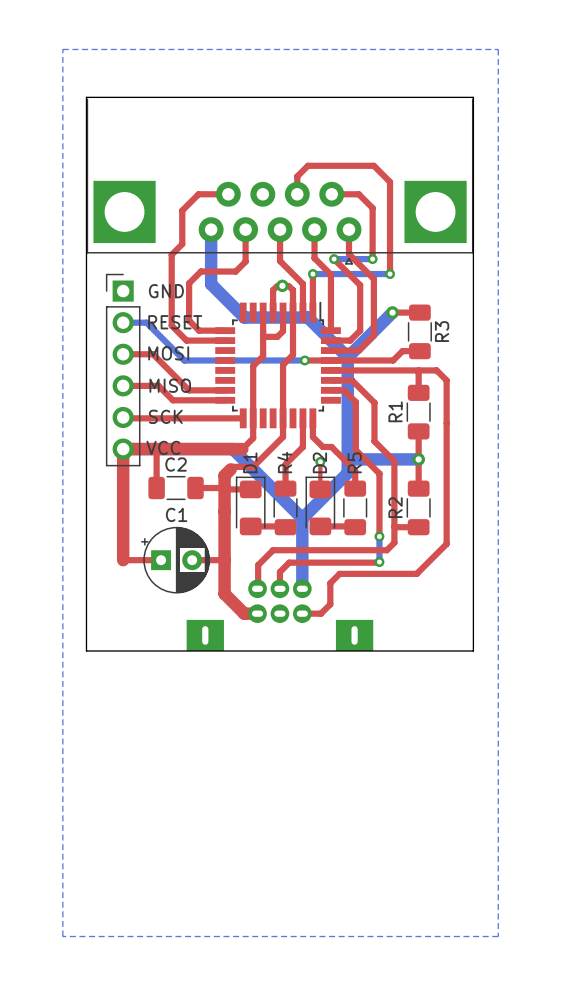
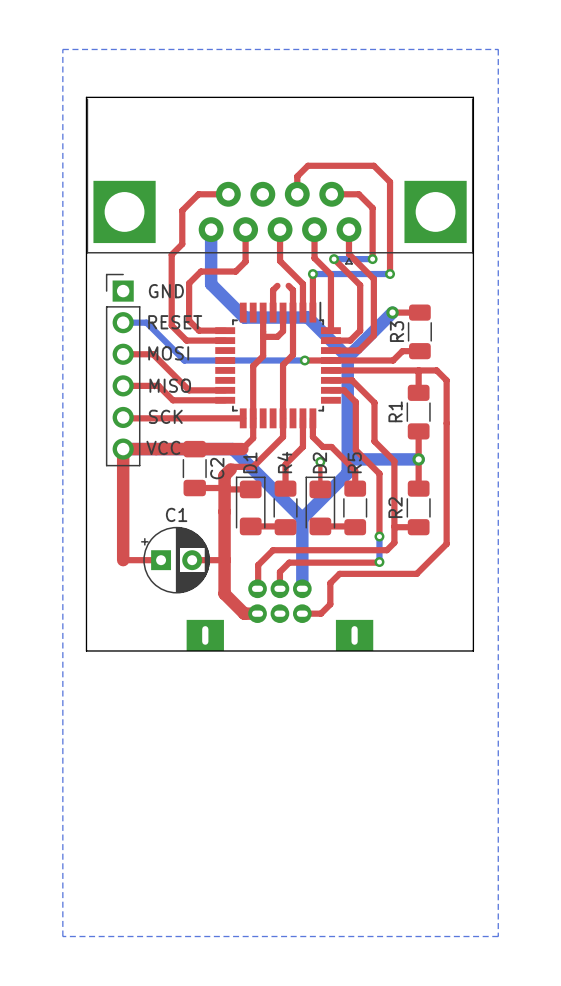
via: (282, 285) -> none
R3 name position: R3 (442, 331) -> R3 (397, 331)
top track: (156, 449) (156, 488) -> none
C2 rotation: 0° (176, 488) -> 90° clockwise (194, 468)

